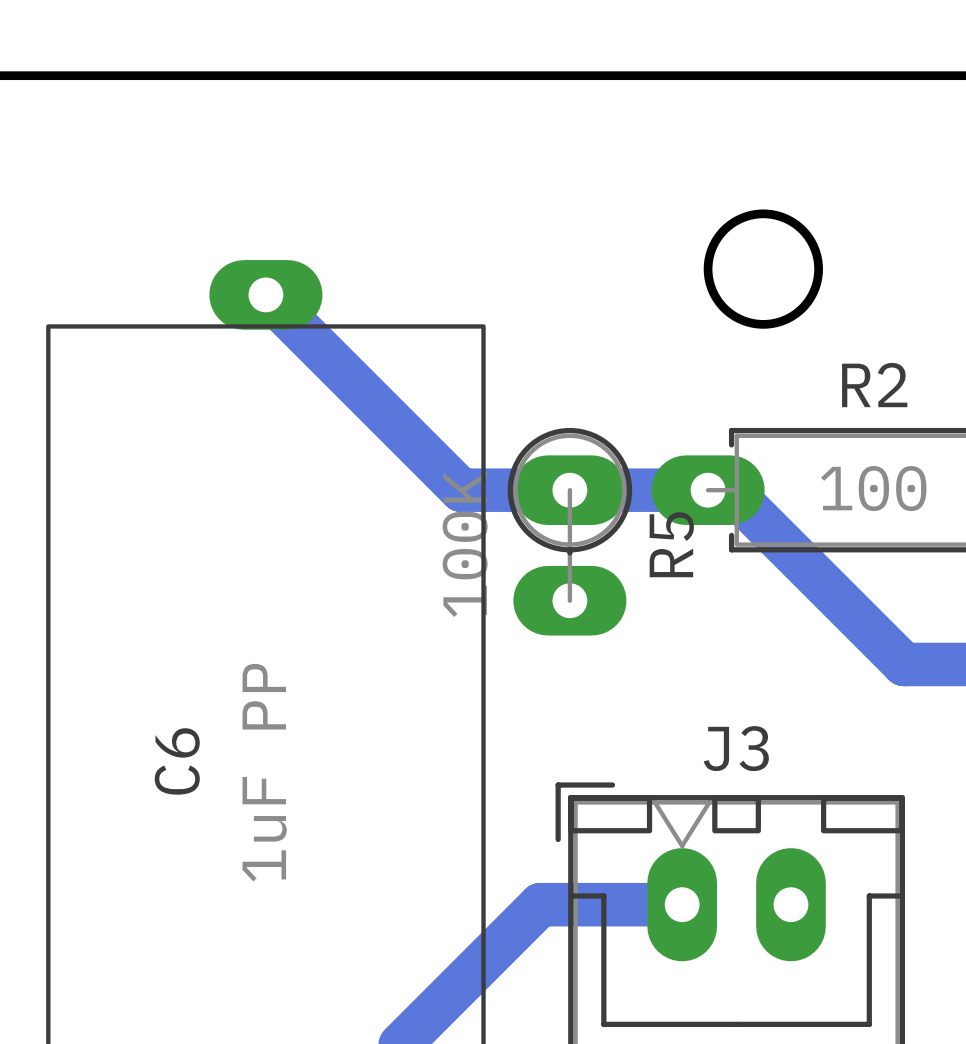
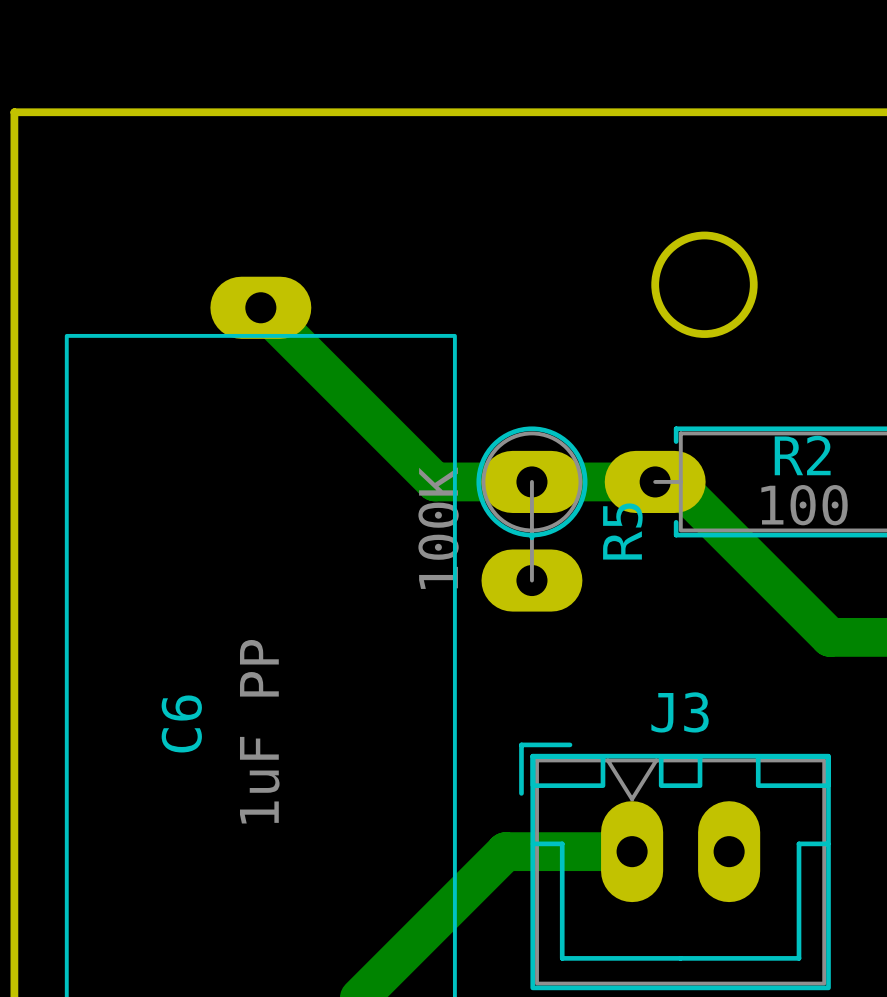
R2 name position: R2 (874, 385) -> R2 (802, 455)
R2 value position: 100 (873, 488) -> 100 (804, 505)

